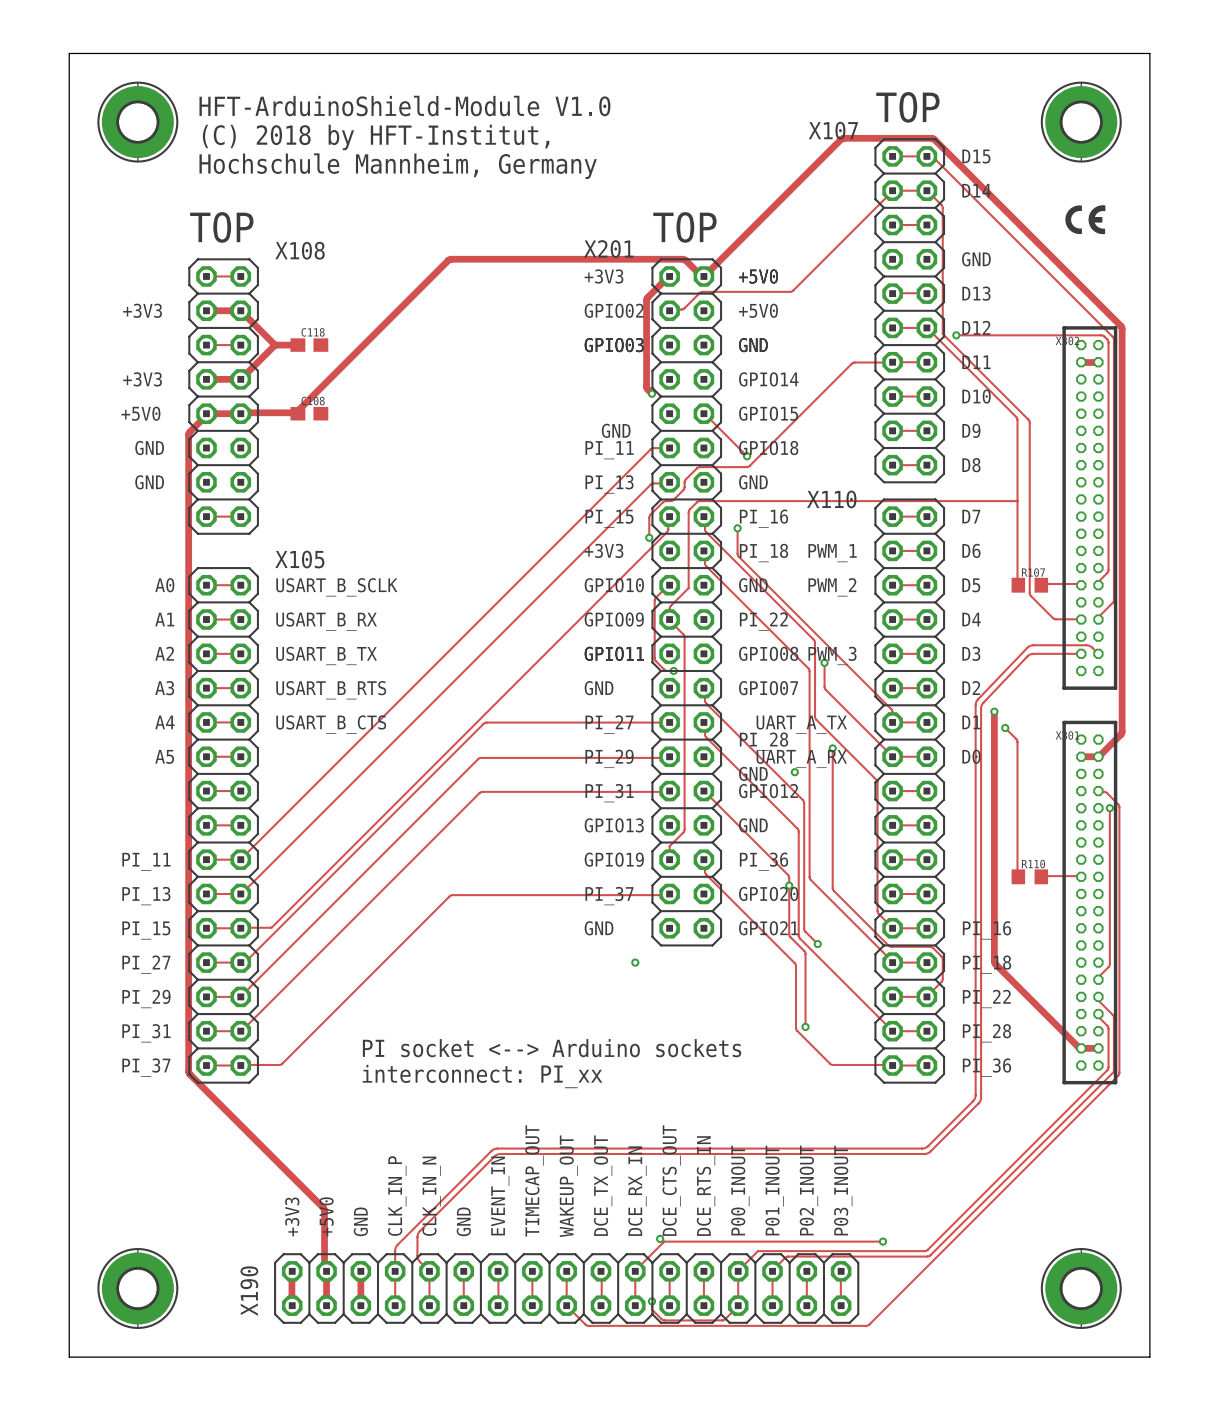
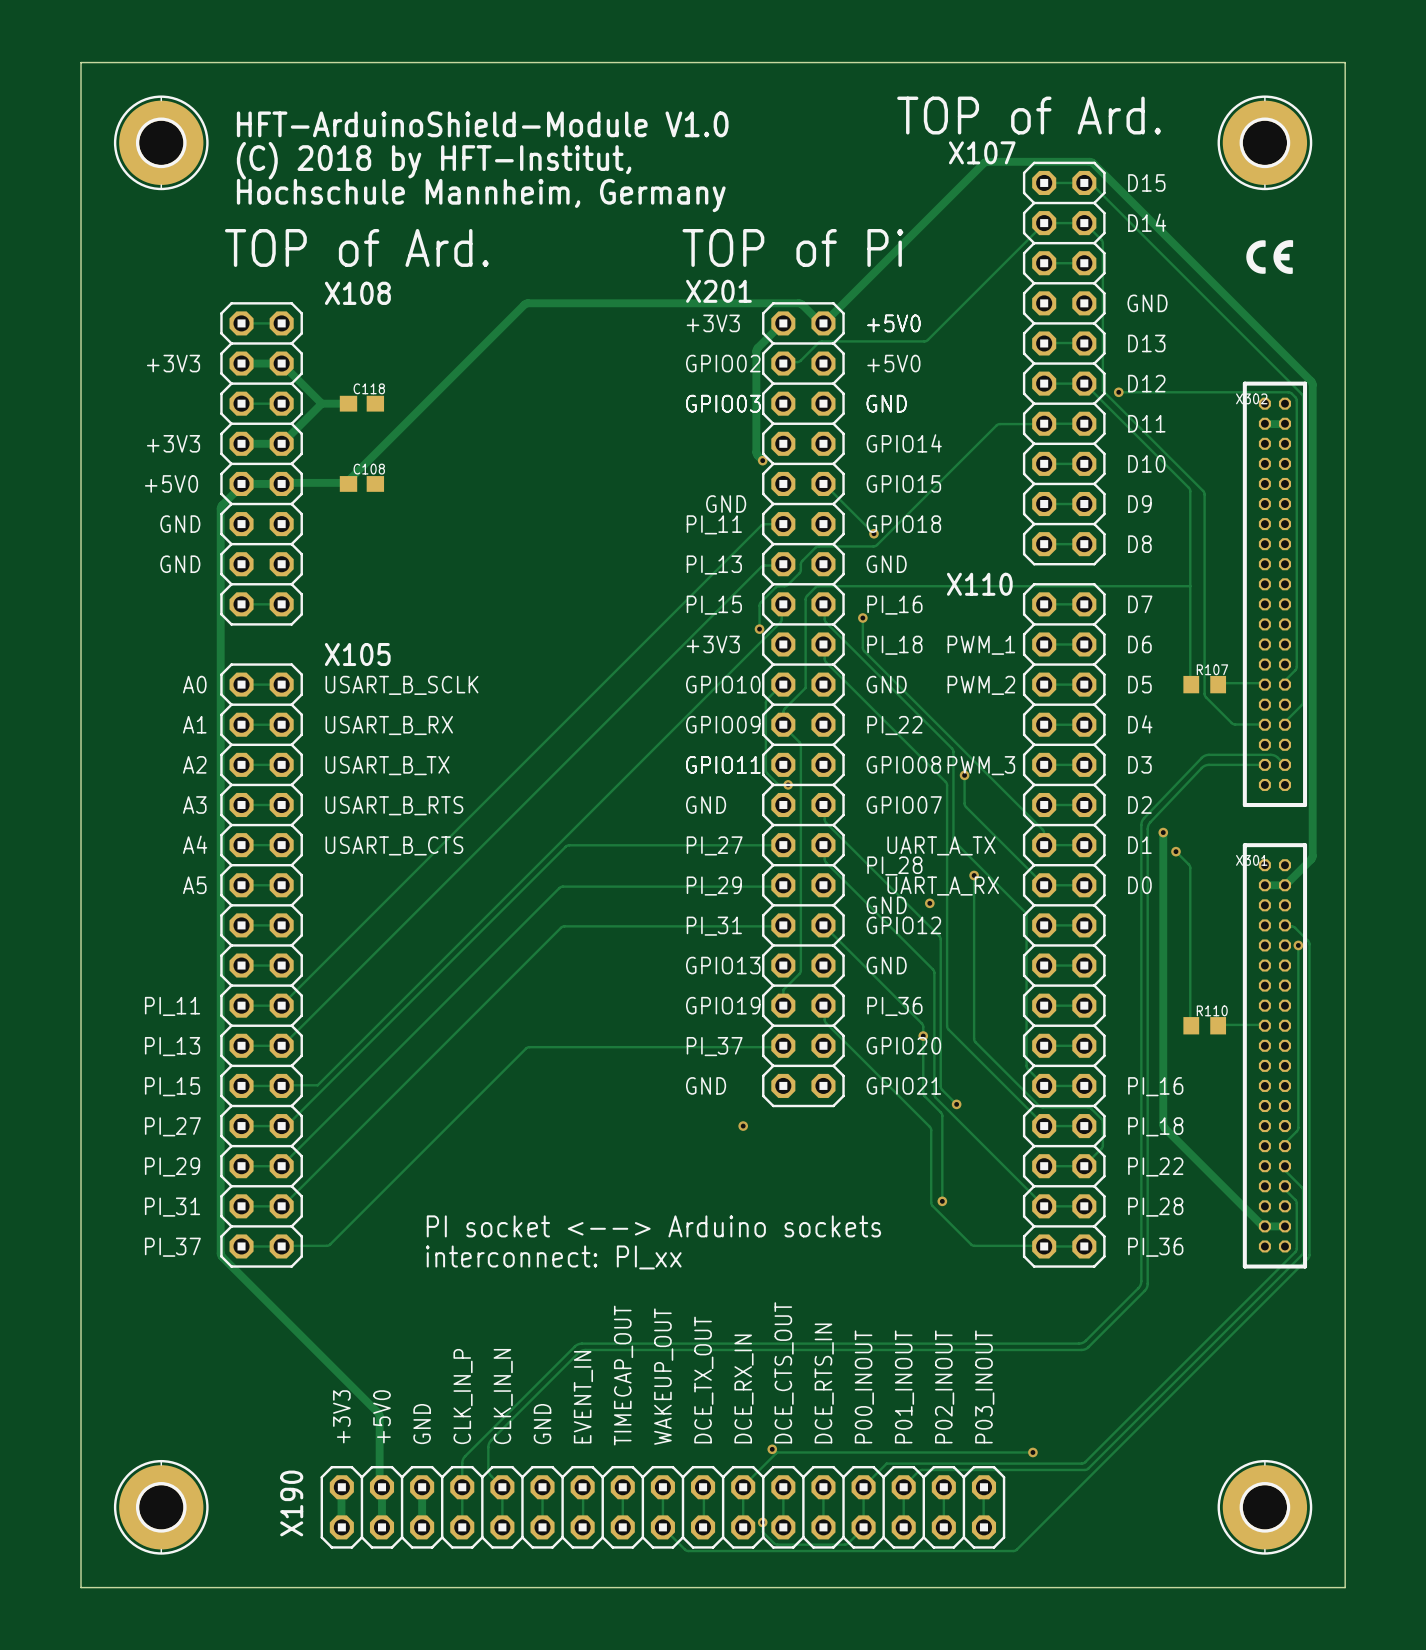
text: none -> TOP of Ard. (1029, 115)
text: TOP (907, 107) -> none
text: none -> TOP of Ard. (356, 247)
text: none -> TOP of Pi (792, 247)
text: TOP (221, 227) -> none
text: TOP (684, 227) -> none

